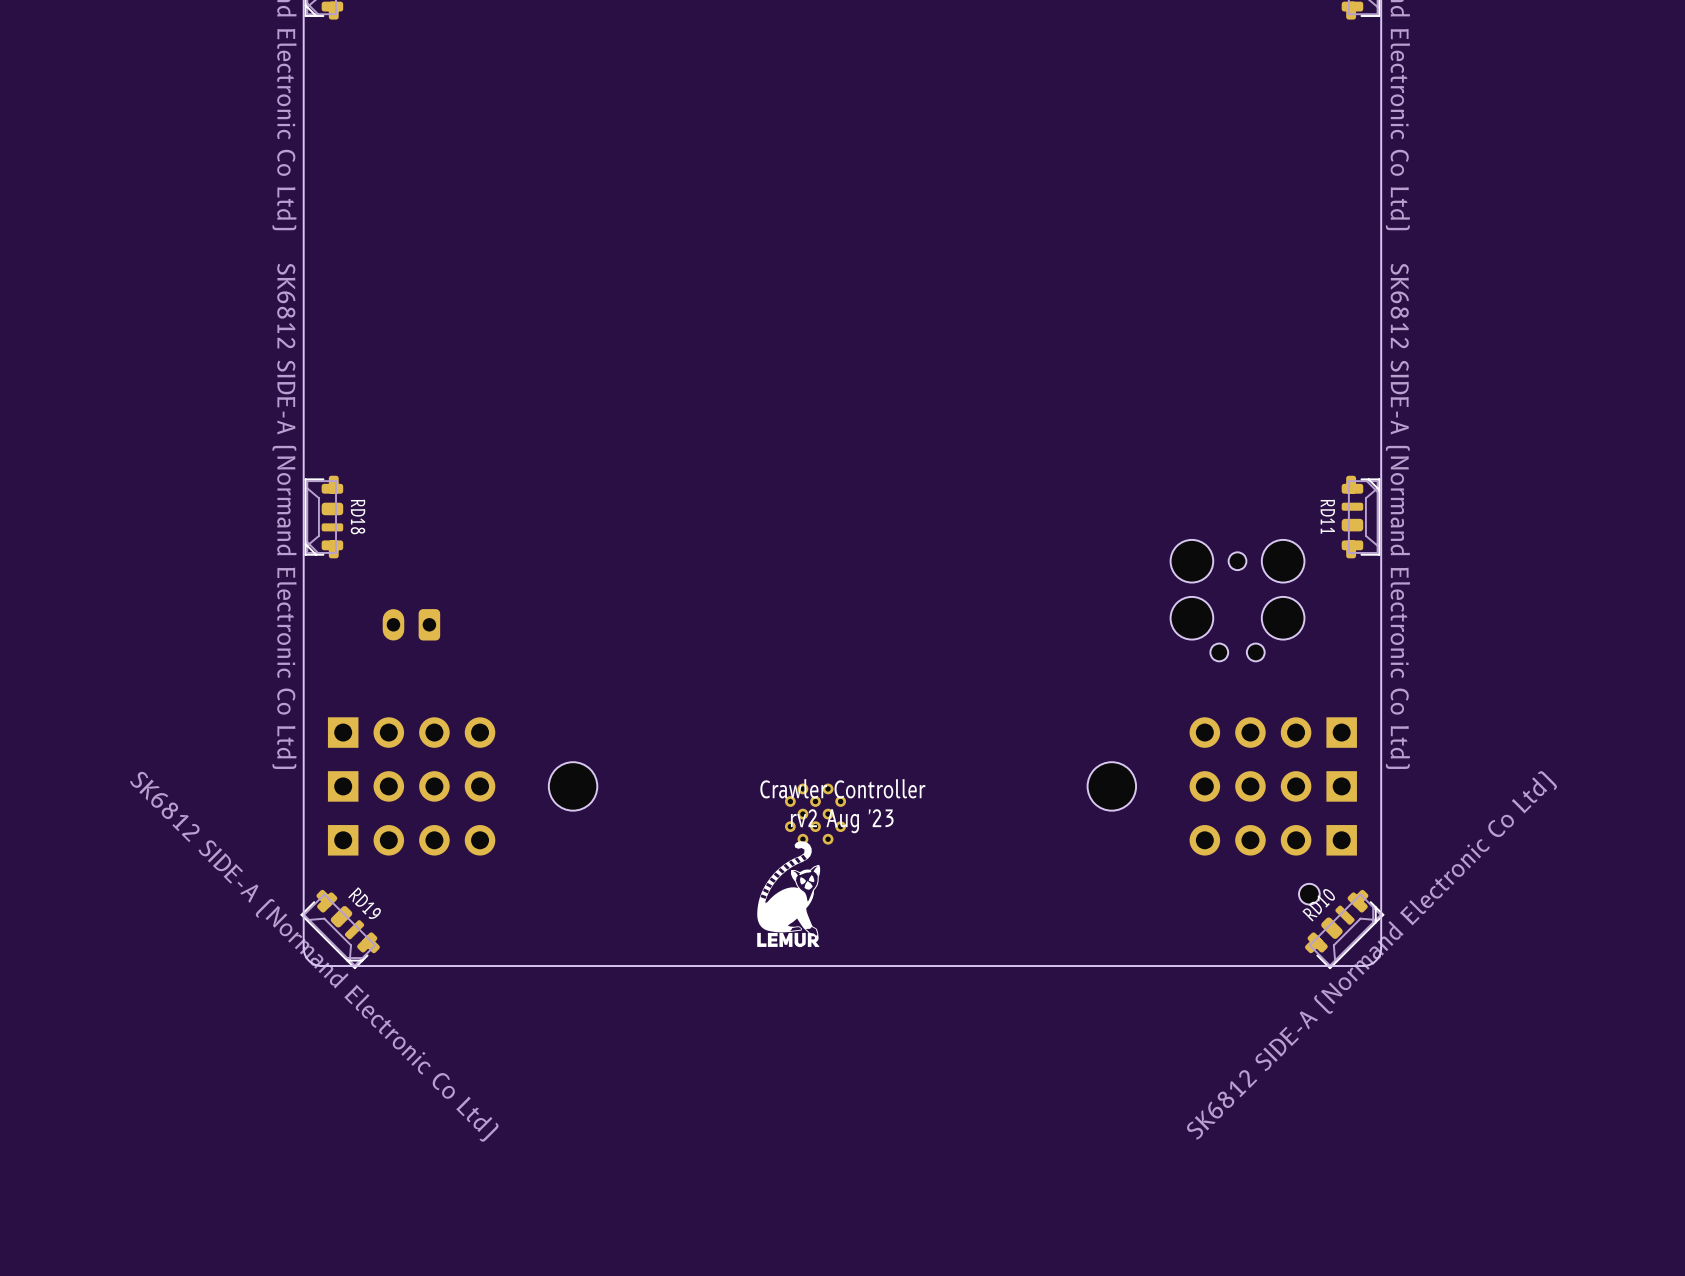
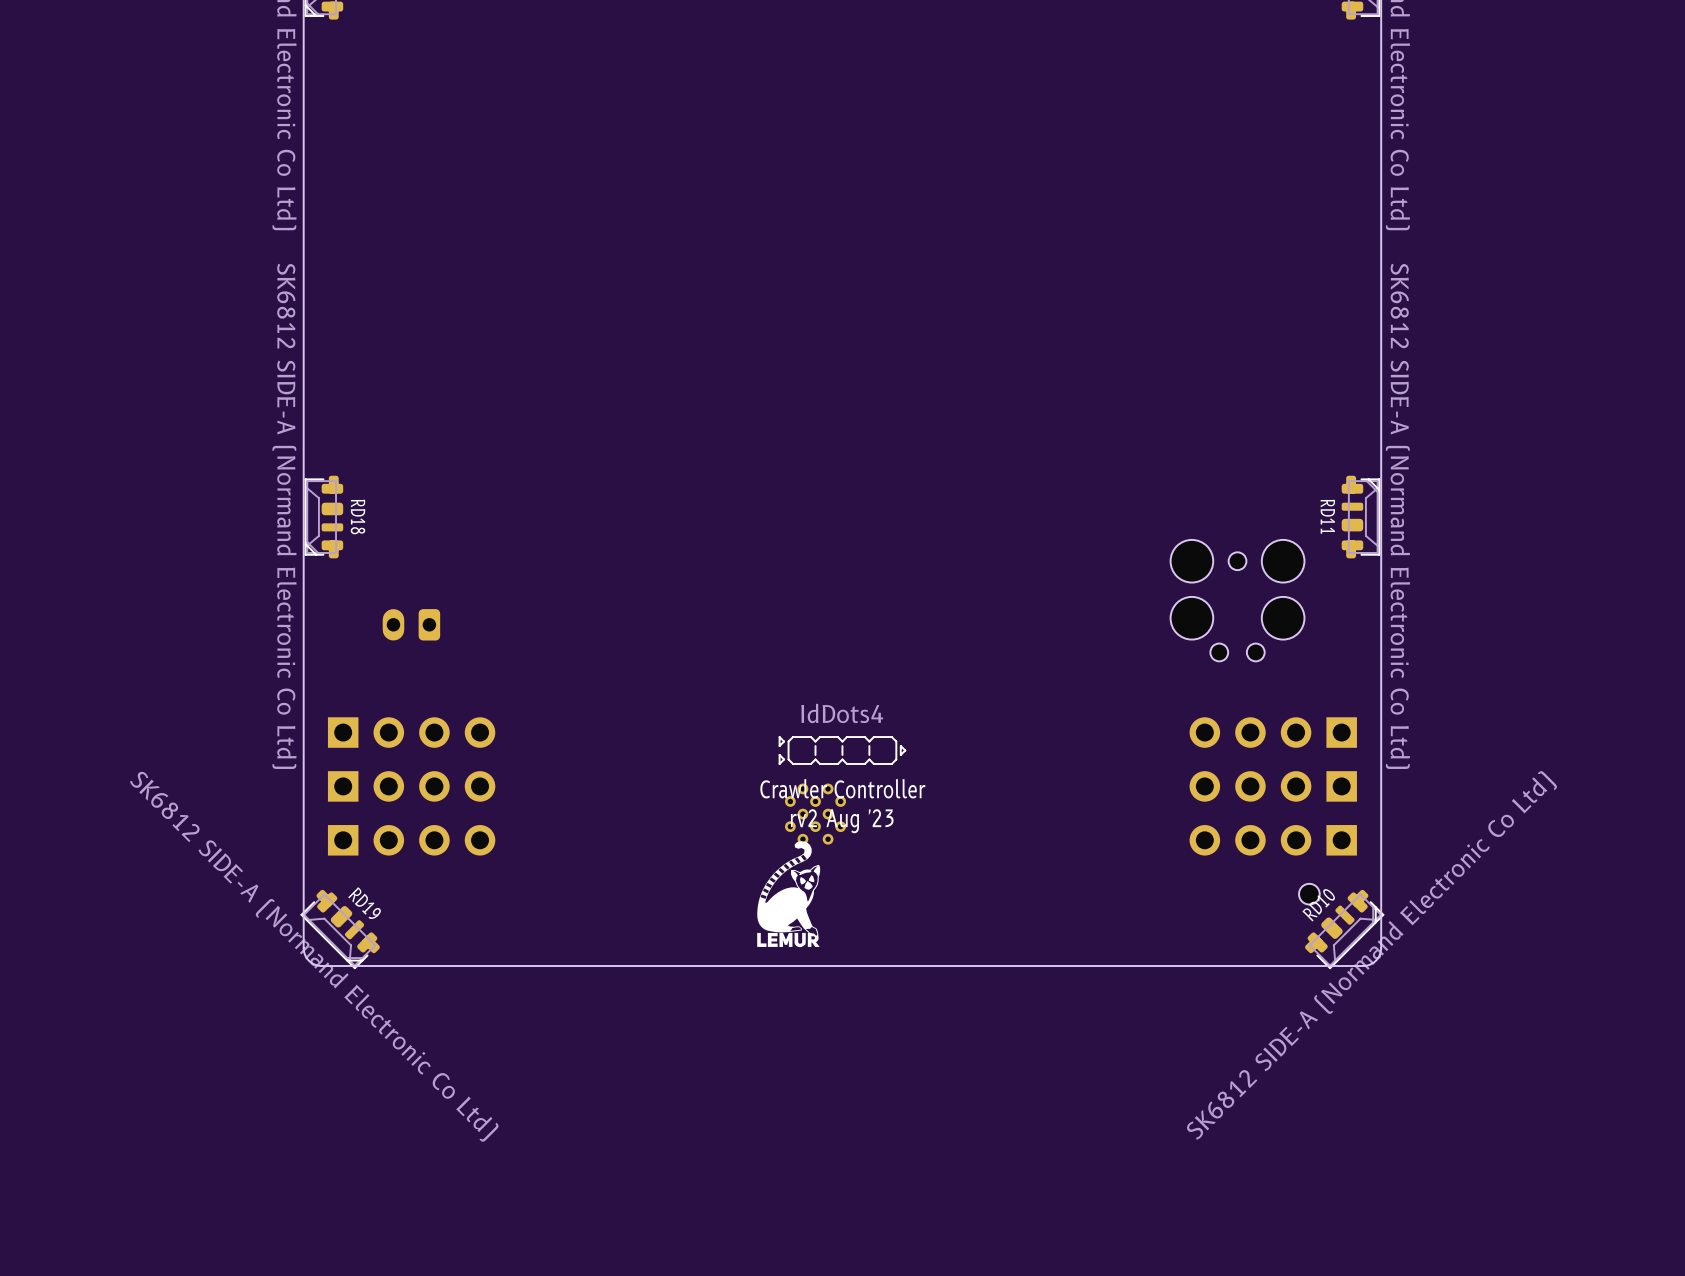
drawing: none -> [778, 736, 907, 765]
part: (573, 786) -> none
part: (1111, 786) -> none

